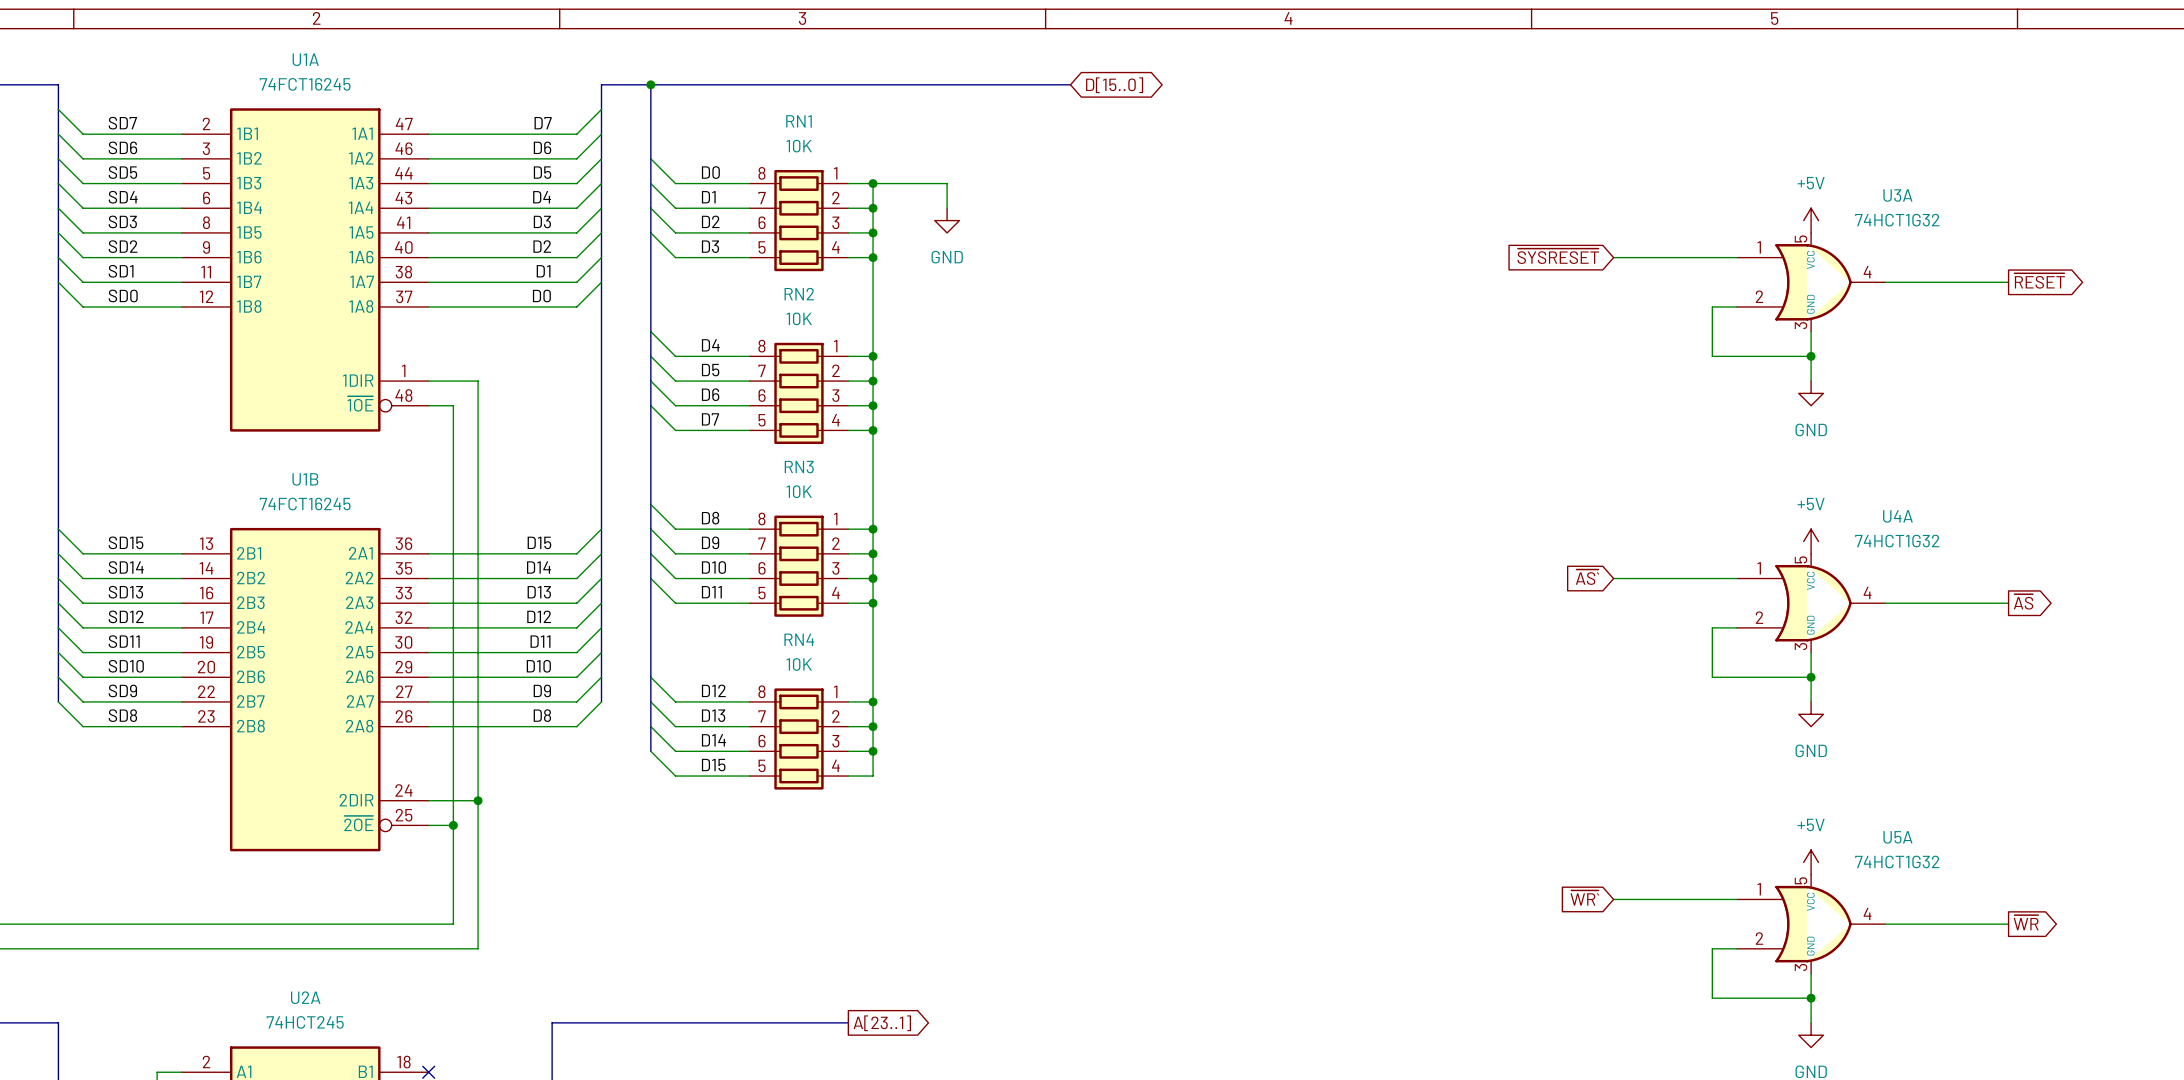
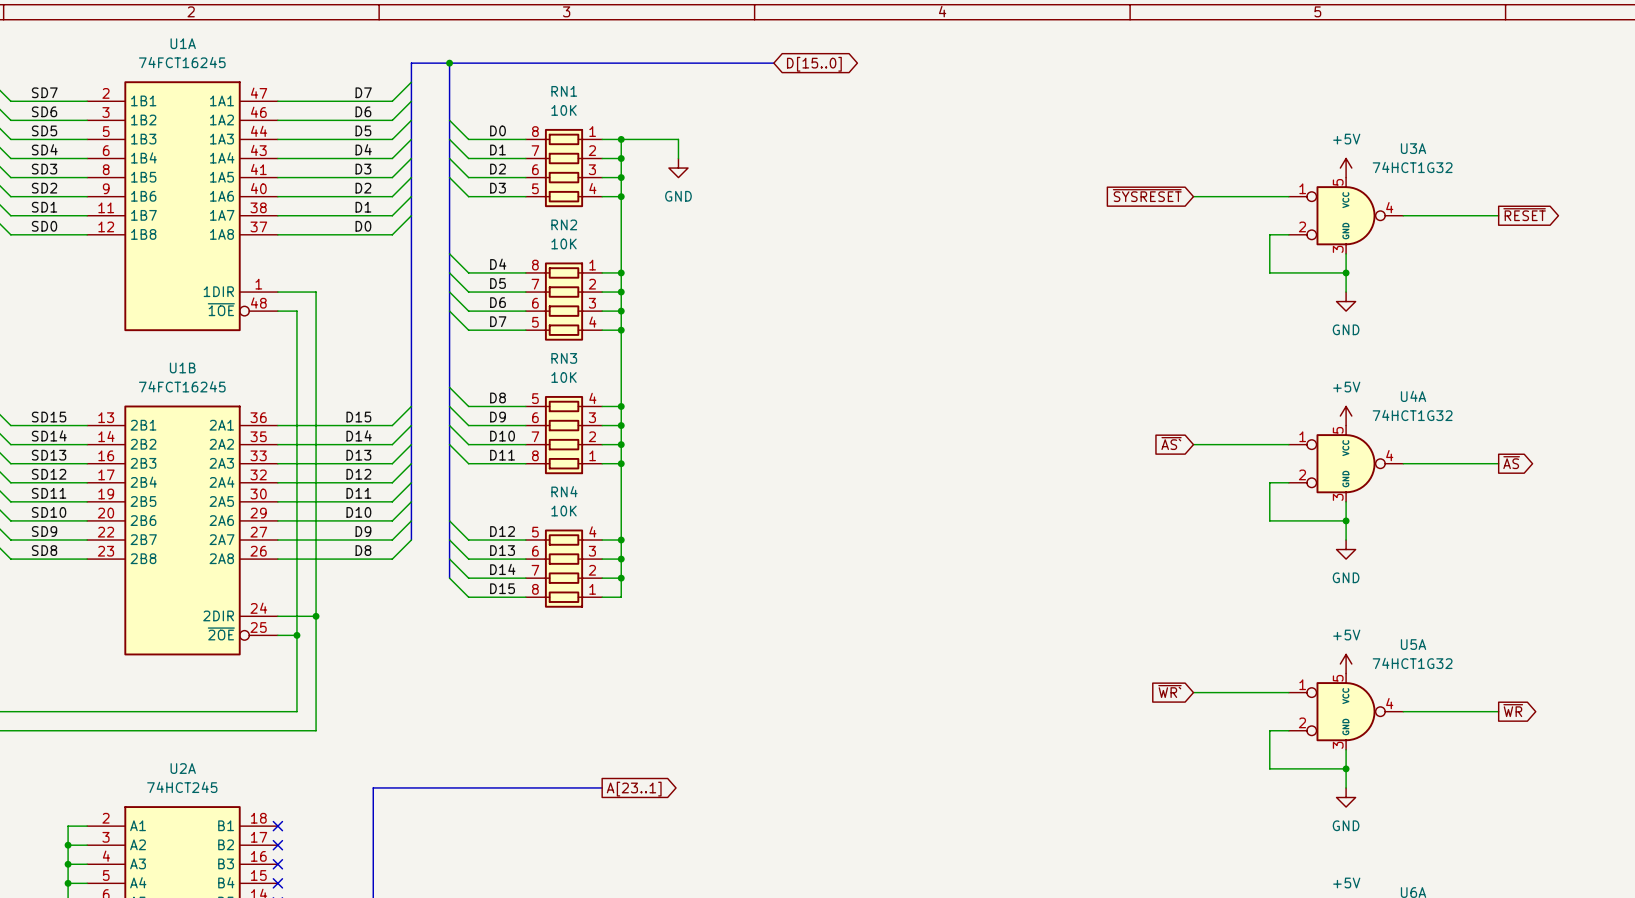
U3A symbol: [1737, 244, 1886, 321] -> [1288, 186, 1404, 246]
U4A symbol: [1737, 564, 1886, 642] -> [1288, 434, 1404, 494]
RN3 flip: as is (798, 566) -> up-down (564, 435)
RN4 flip: as is (798, 738) -> up-down (564, 568)
U5A symbol: [1737, 885, 1886, 963] -> [1288, 682, 1404, 742]

